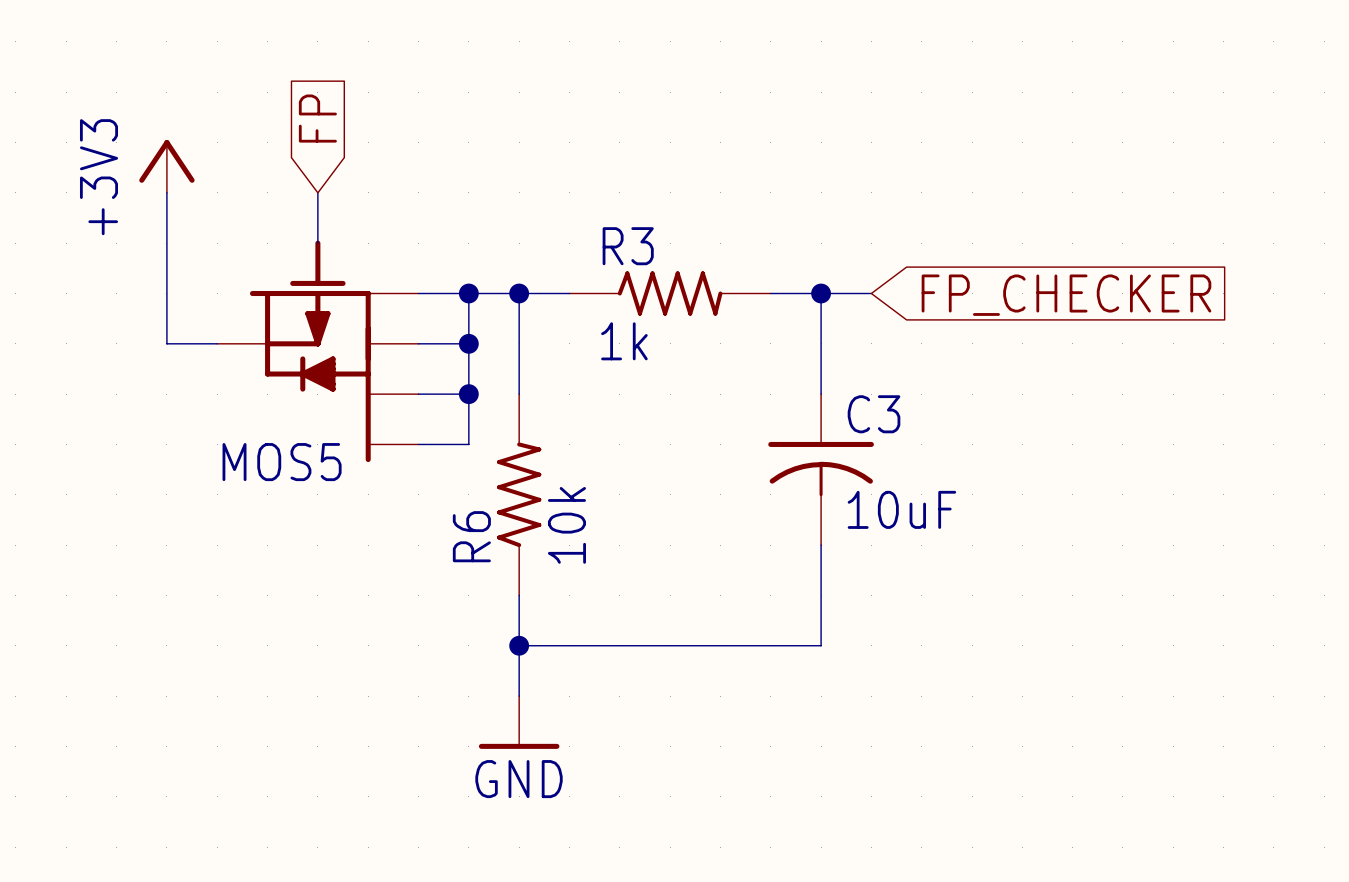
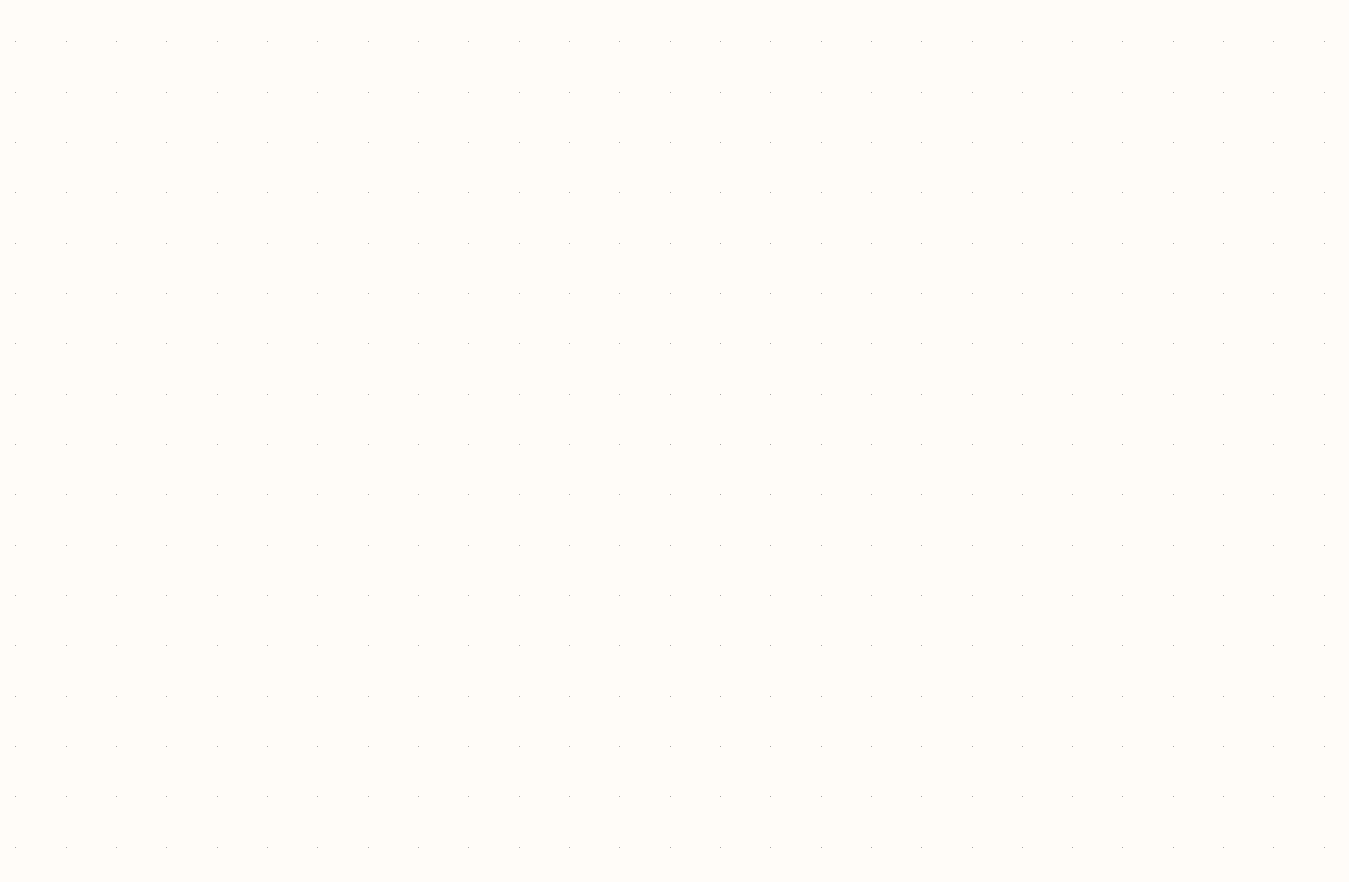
global label: FP (317, 118) -> none
power symbol: +3V3 (166, 166) -> none
wire: (166, 192) (166, 343) (217, 343) -> none
wire: (317, 192) (317, 243) -> none
wire: (418, 293) (569, 293) -> none
wire: (468, 293) (468, 444) (418, 444) -> none
junction: (468, 293) -> none
wire: (519, 293) (519, 394) -> none
junction: (519, 293) -> none
R3: 1k (670, 293) -> none
wire: (770, 293) (871, 293) -> none
wire: (821, 293) (821, 394) -> none
junction: (821, 293) -> none
global label: FP_CHECKER (1066, 295) -> none
wire: (418, 343) (468, 343) -> none
junction: (468, 343) -> none
MOS5: (317, 351) -> none
wire: (418, 394) (468, 394) -> none
junction: (468, 394) -> none
C3: 10uF (821, 469) -> none
R6: 10k (519, 494) -> none
wire: (821, 545) (821, 645) (519, 645) -> none
wire: (519, 595) (519, 696) -> none
junction: (519, 645) -> none
power symbol: GND (519, 722) -> none

